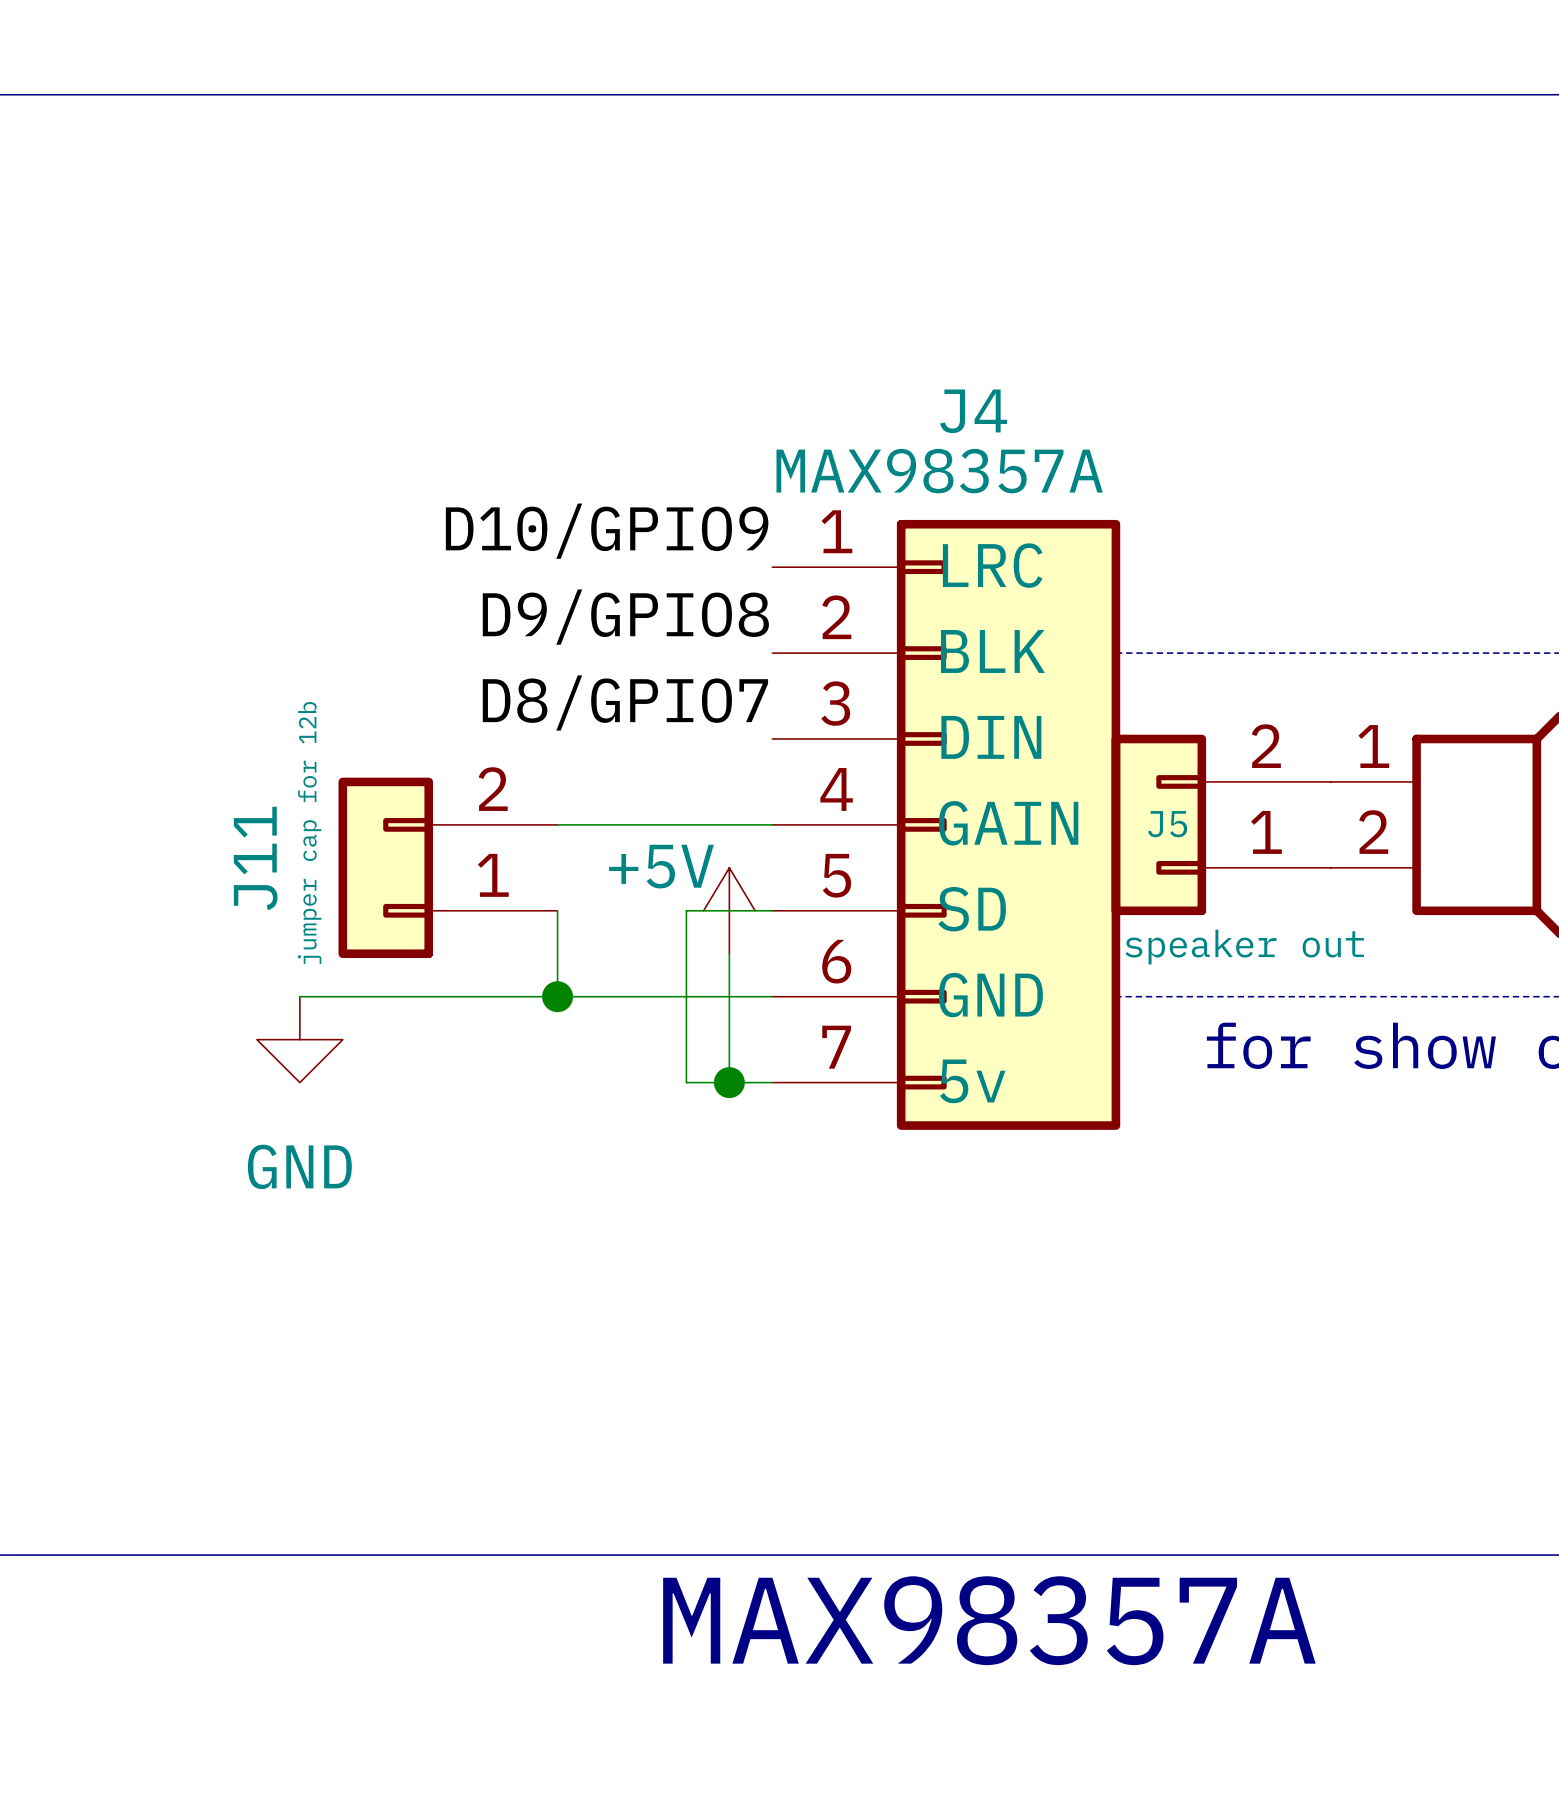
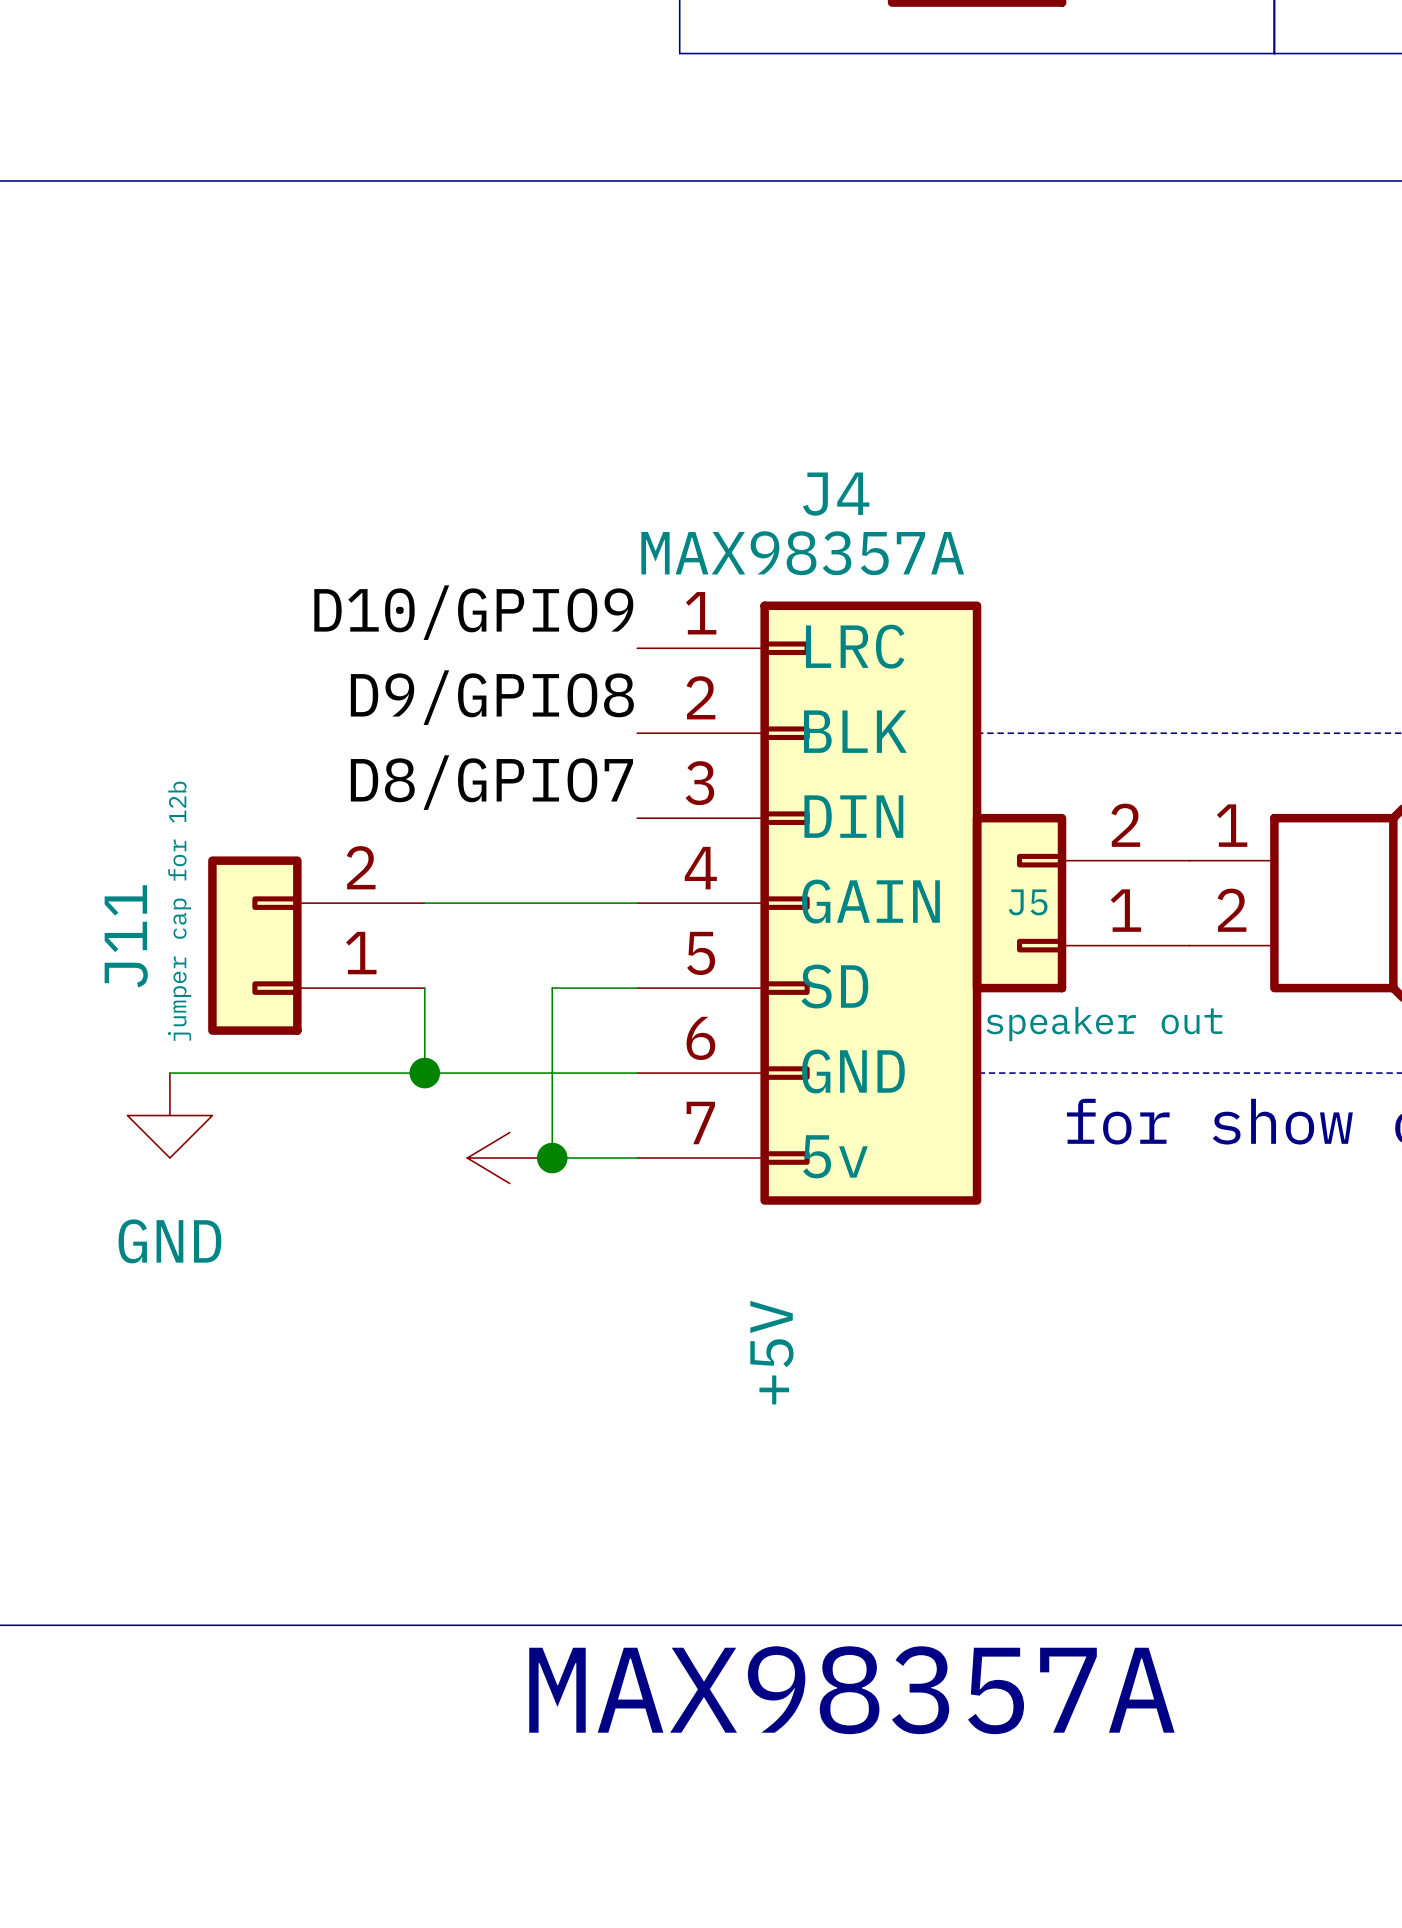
power symbol text position: +5V (661, 866) -> +5V (771, 1352)
power symbol rotation: 0° (729, 910) -> 90° counterclockwise (509, 1158)
power symbol position: +5V (729, 910) -> +5V (509, 1158)
wire: (729, 953) (729, 1082) -> none
junction position: (729, 1082) -> (552, 1158)

